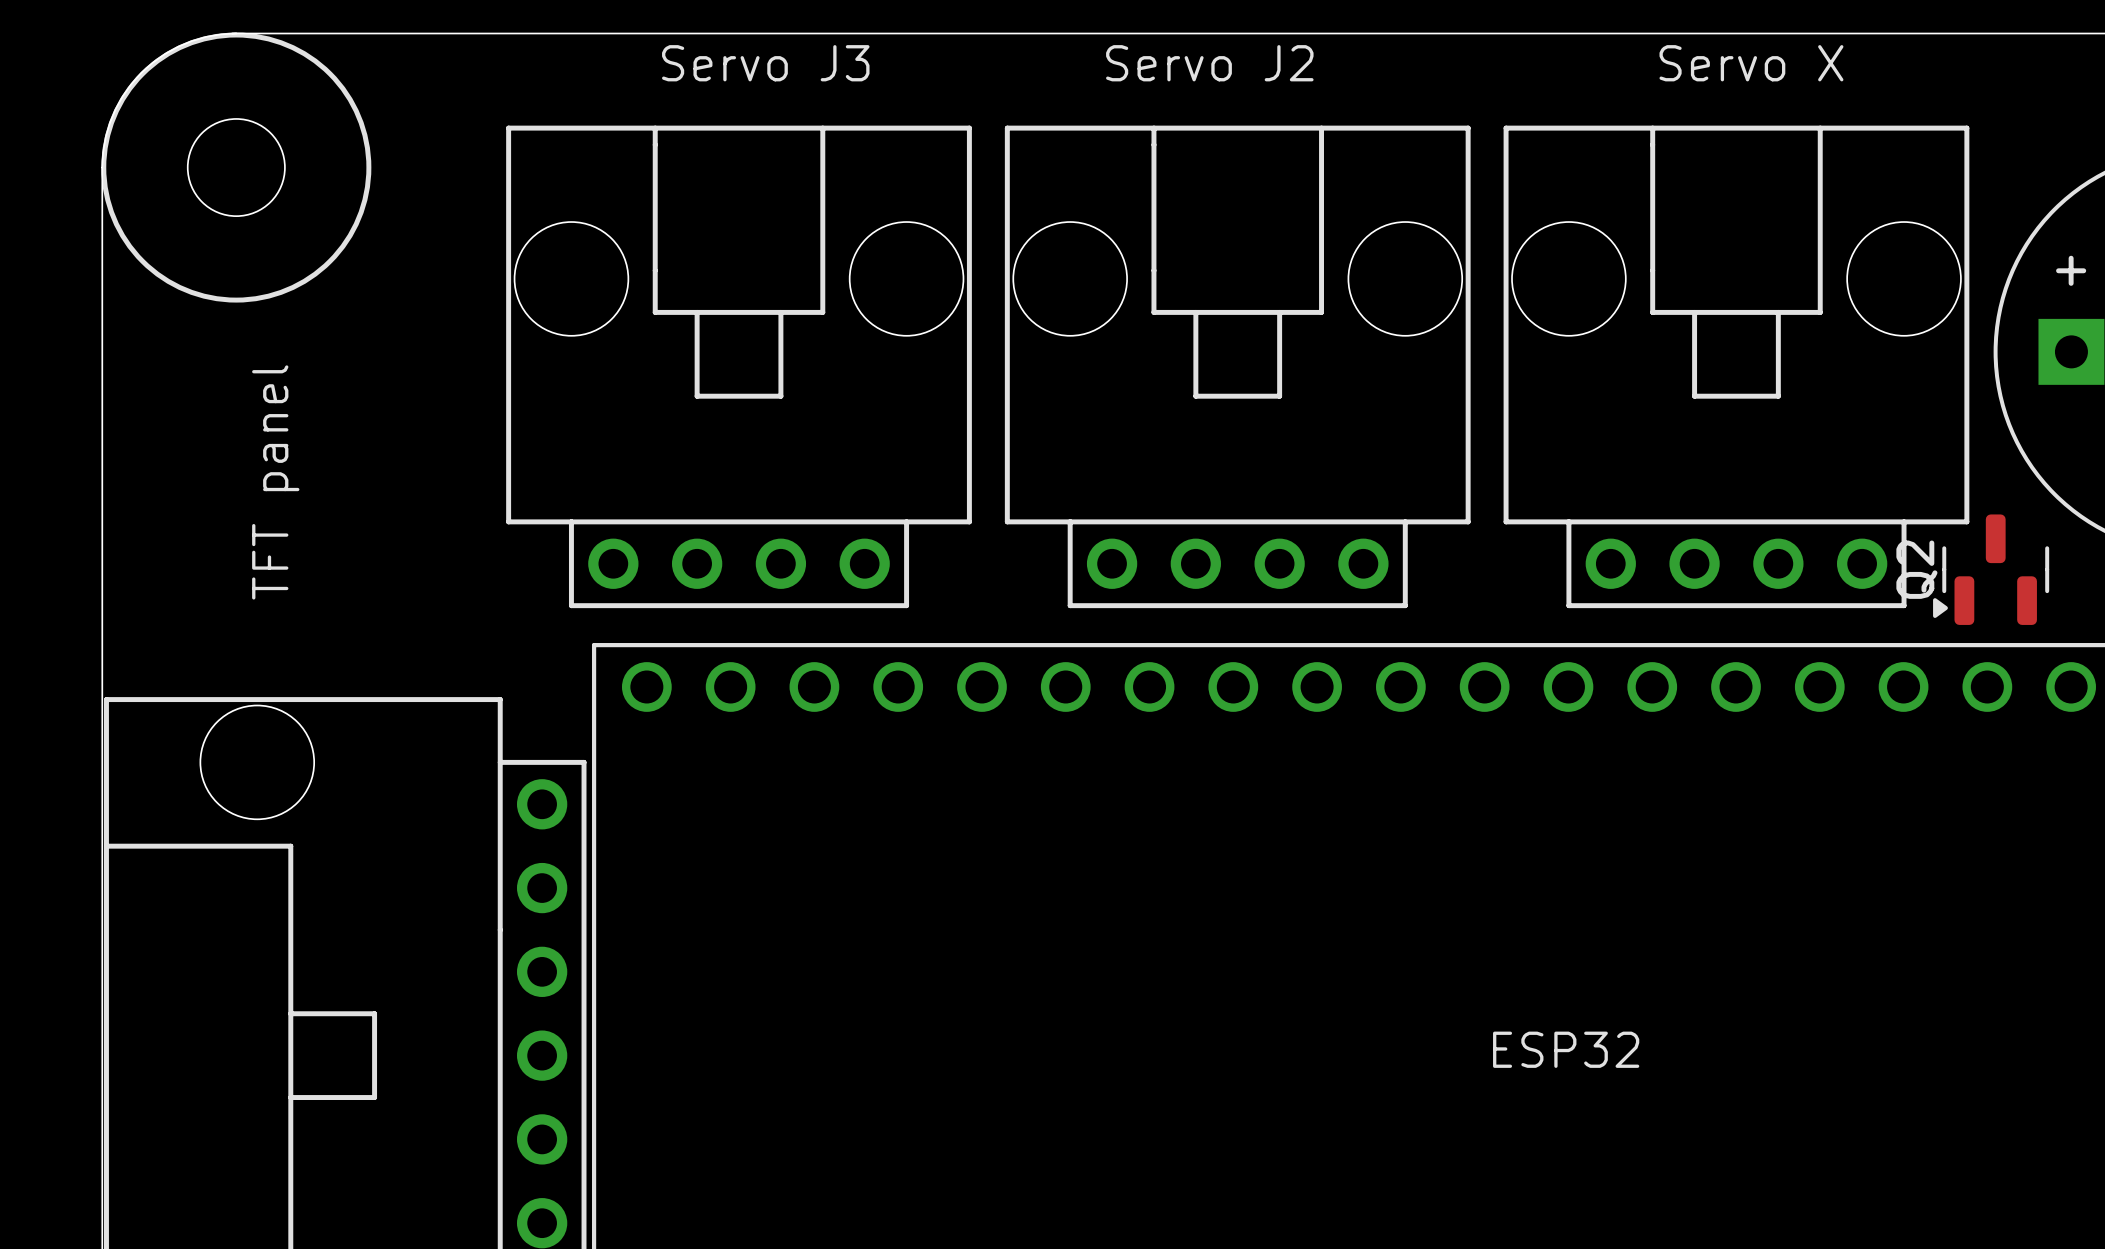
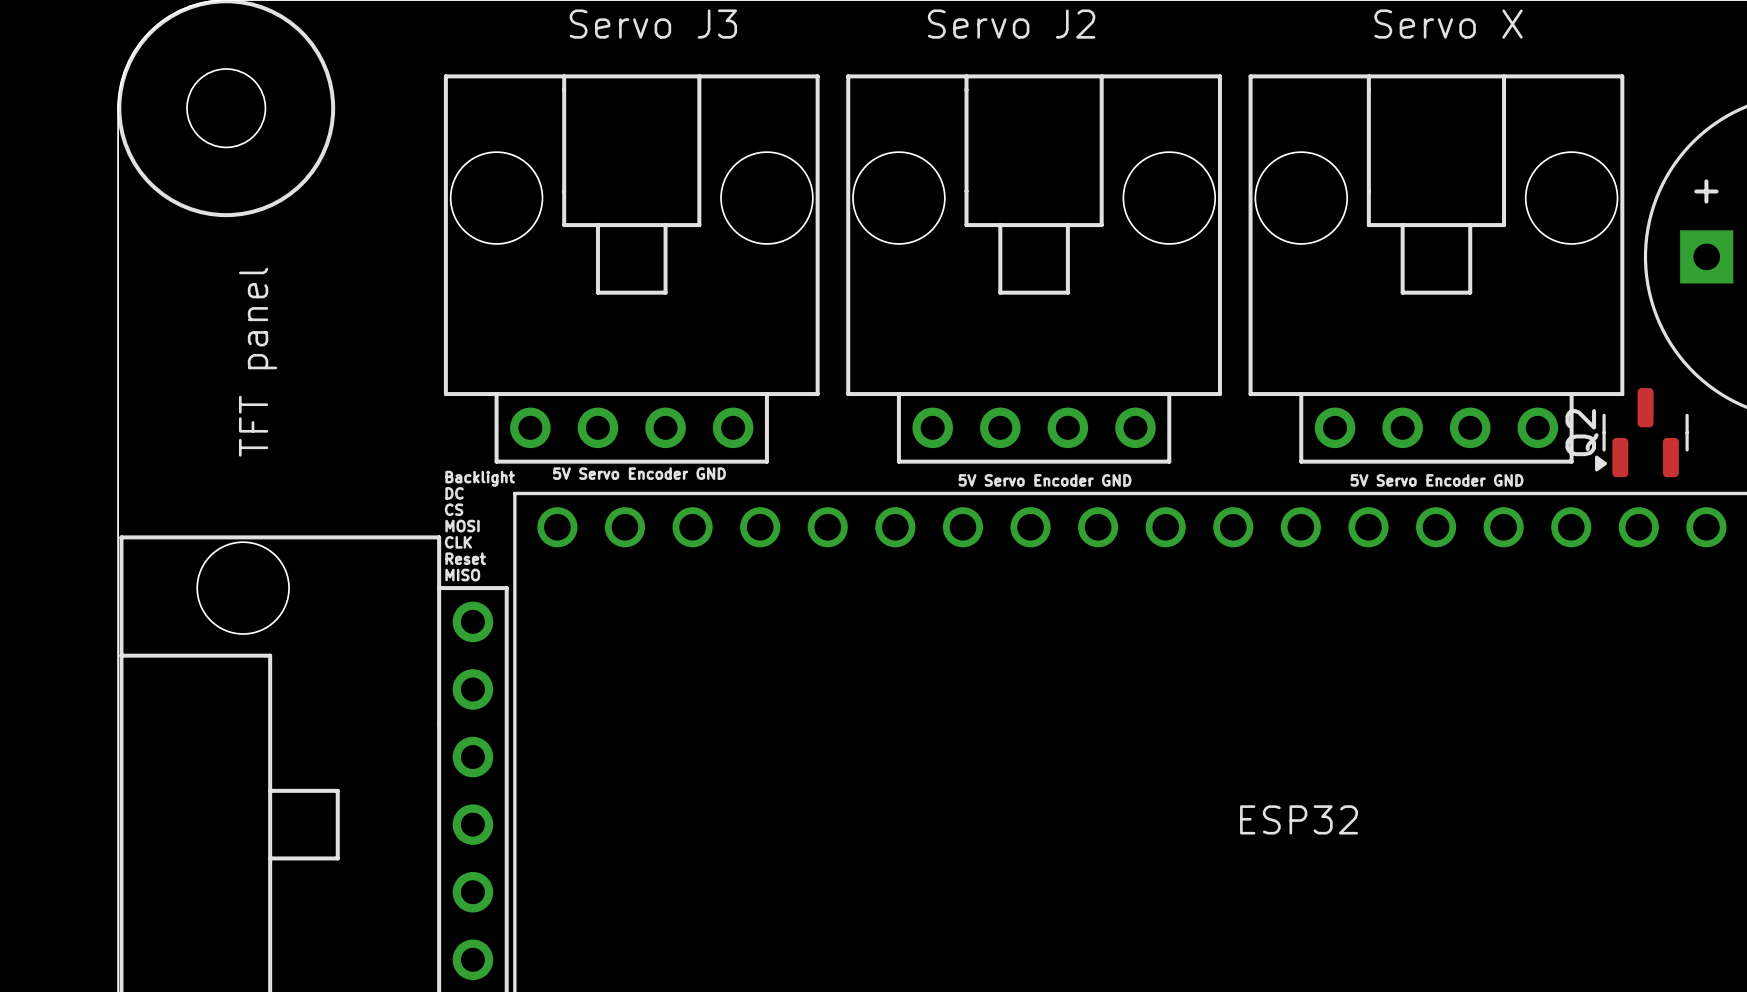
text: none -> 5V Servo Encoder GND (639, 473)
text: none -> Backlight (480, 478)
text: none -> 5V Servo Encoder GND (1045, 480)
text: none -> 5V Servo Encoder GND (1437, 480)
text: none -> DC (454, 493)
text: none -> CS (454, 509)
text: none -> MOSI (462, 526)
text: none -> CLK (458, 542)
text: none -> Reset (465, 558)
text: none -> MISO (462, 575)

